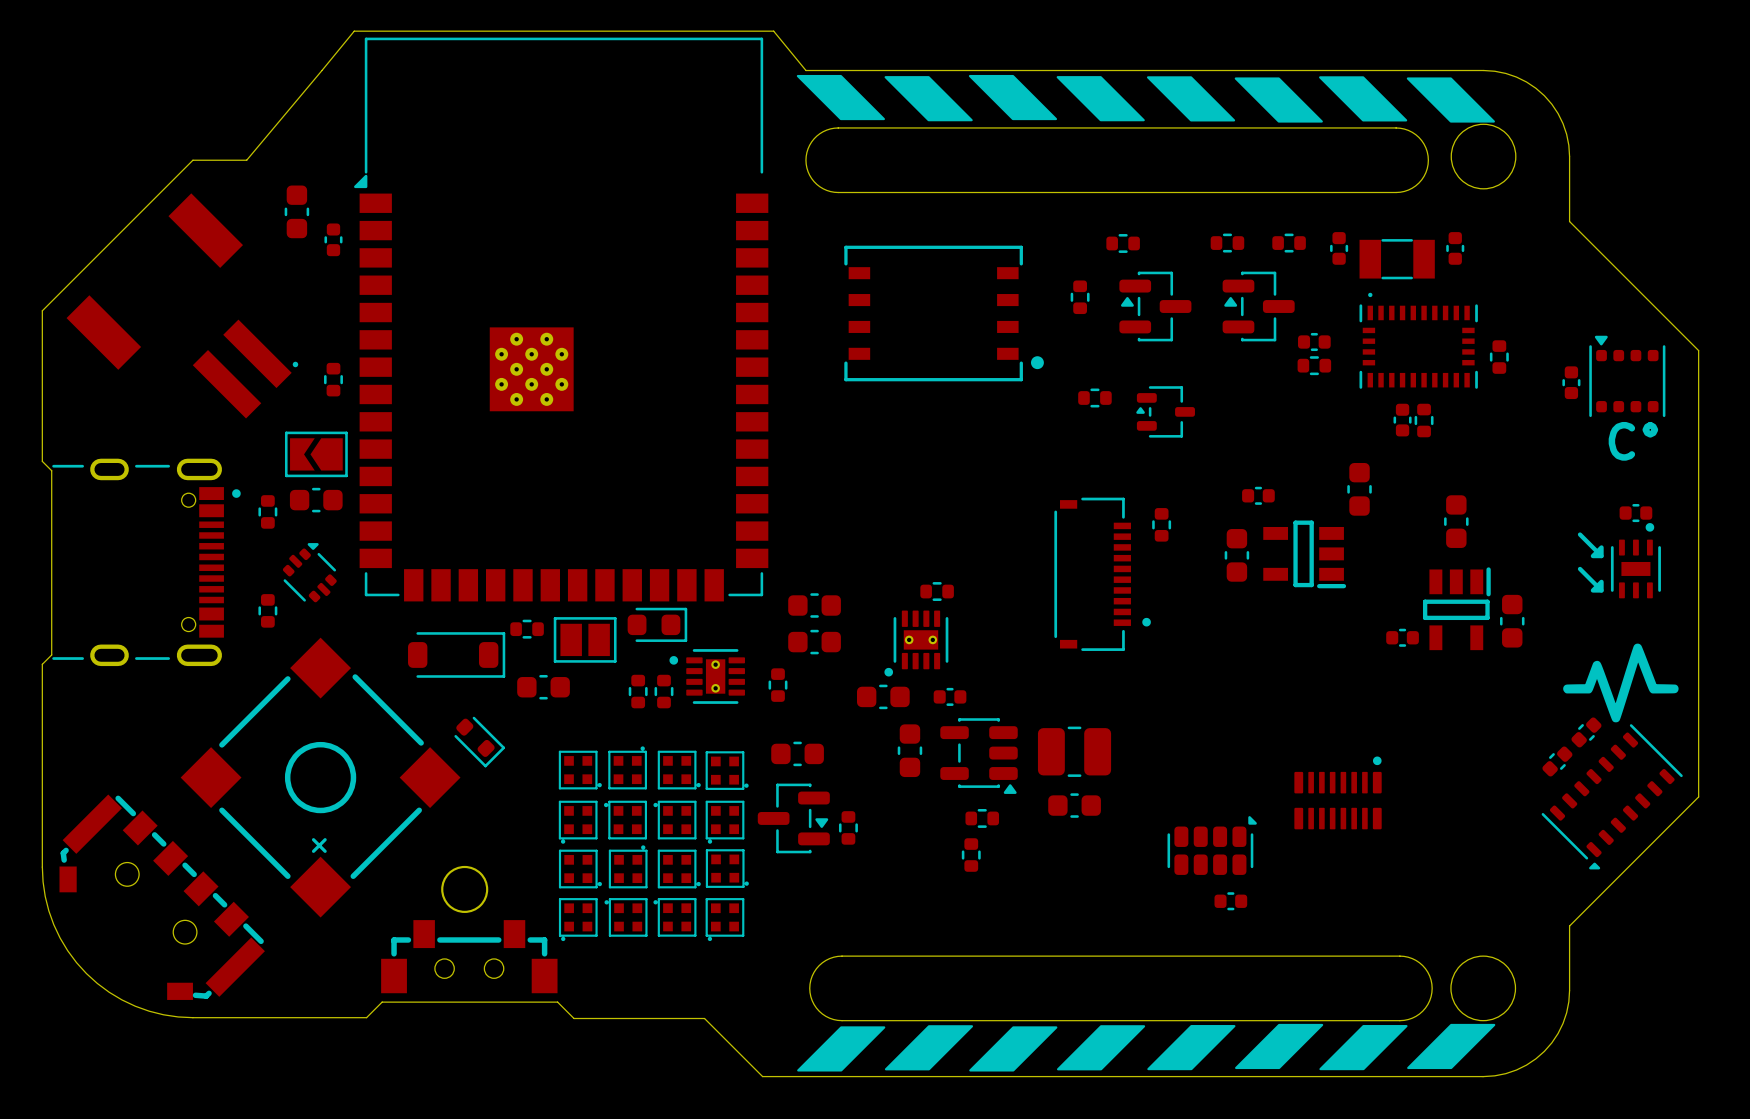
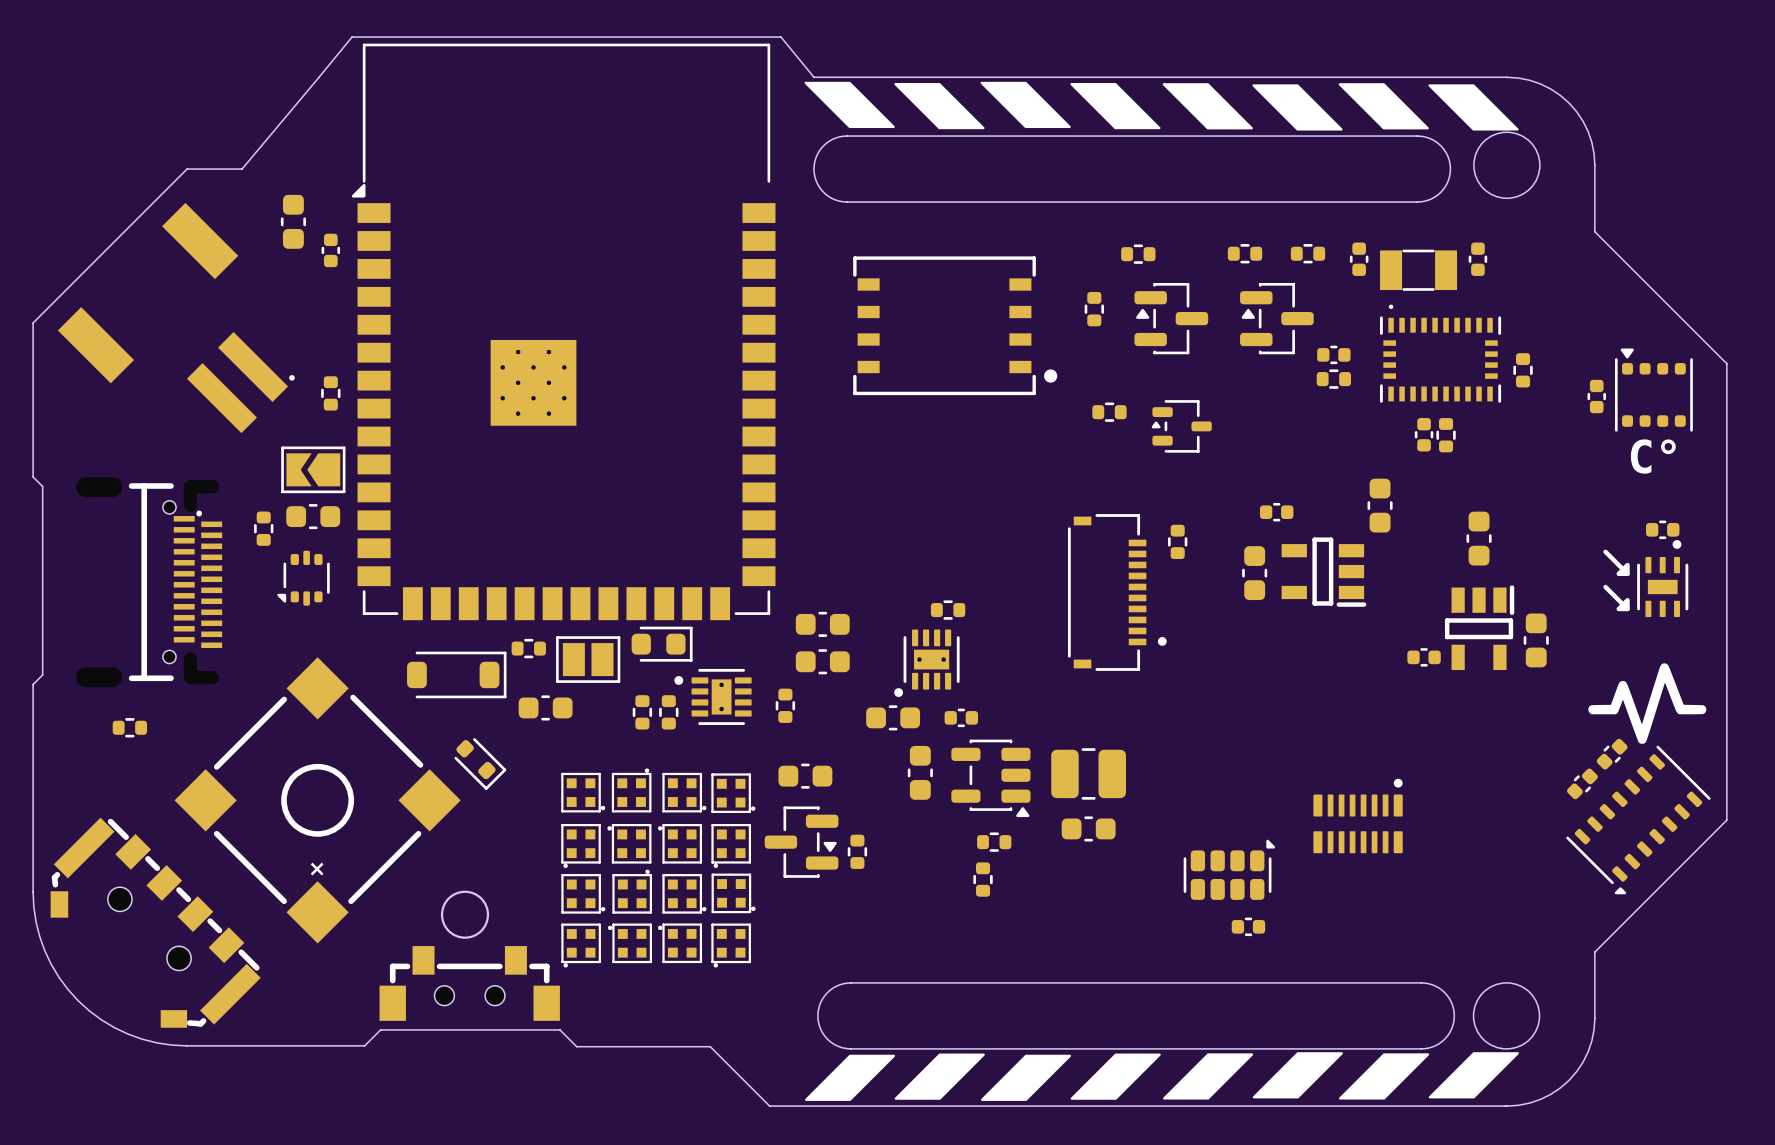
part footprint: [52, 458, 241, 667] -> [75, 477, 223, 688]
part rotation: 0° (309, 572) -> 135° counterclockwise (303, 578)
part rotation: 0° (267, 610) -> 90° clockwise (129, 727)
part position: (267, 610) -> (129, 727)

